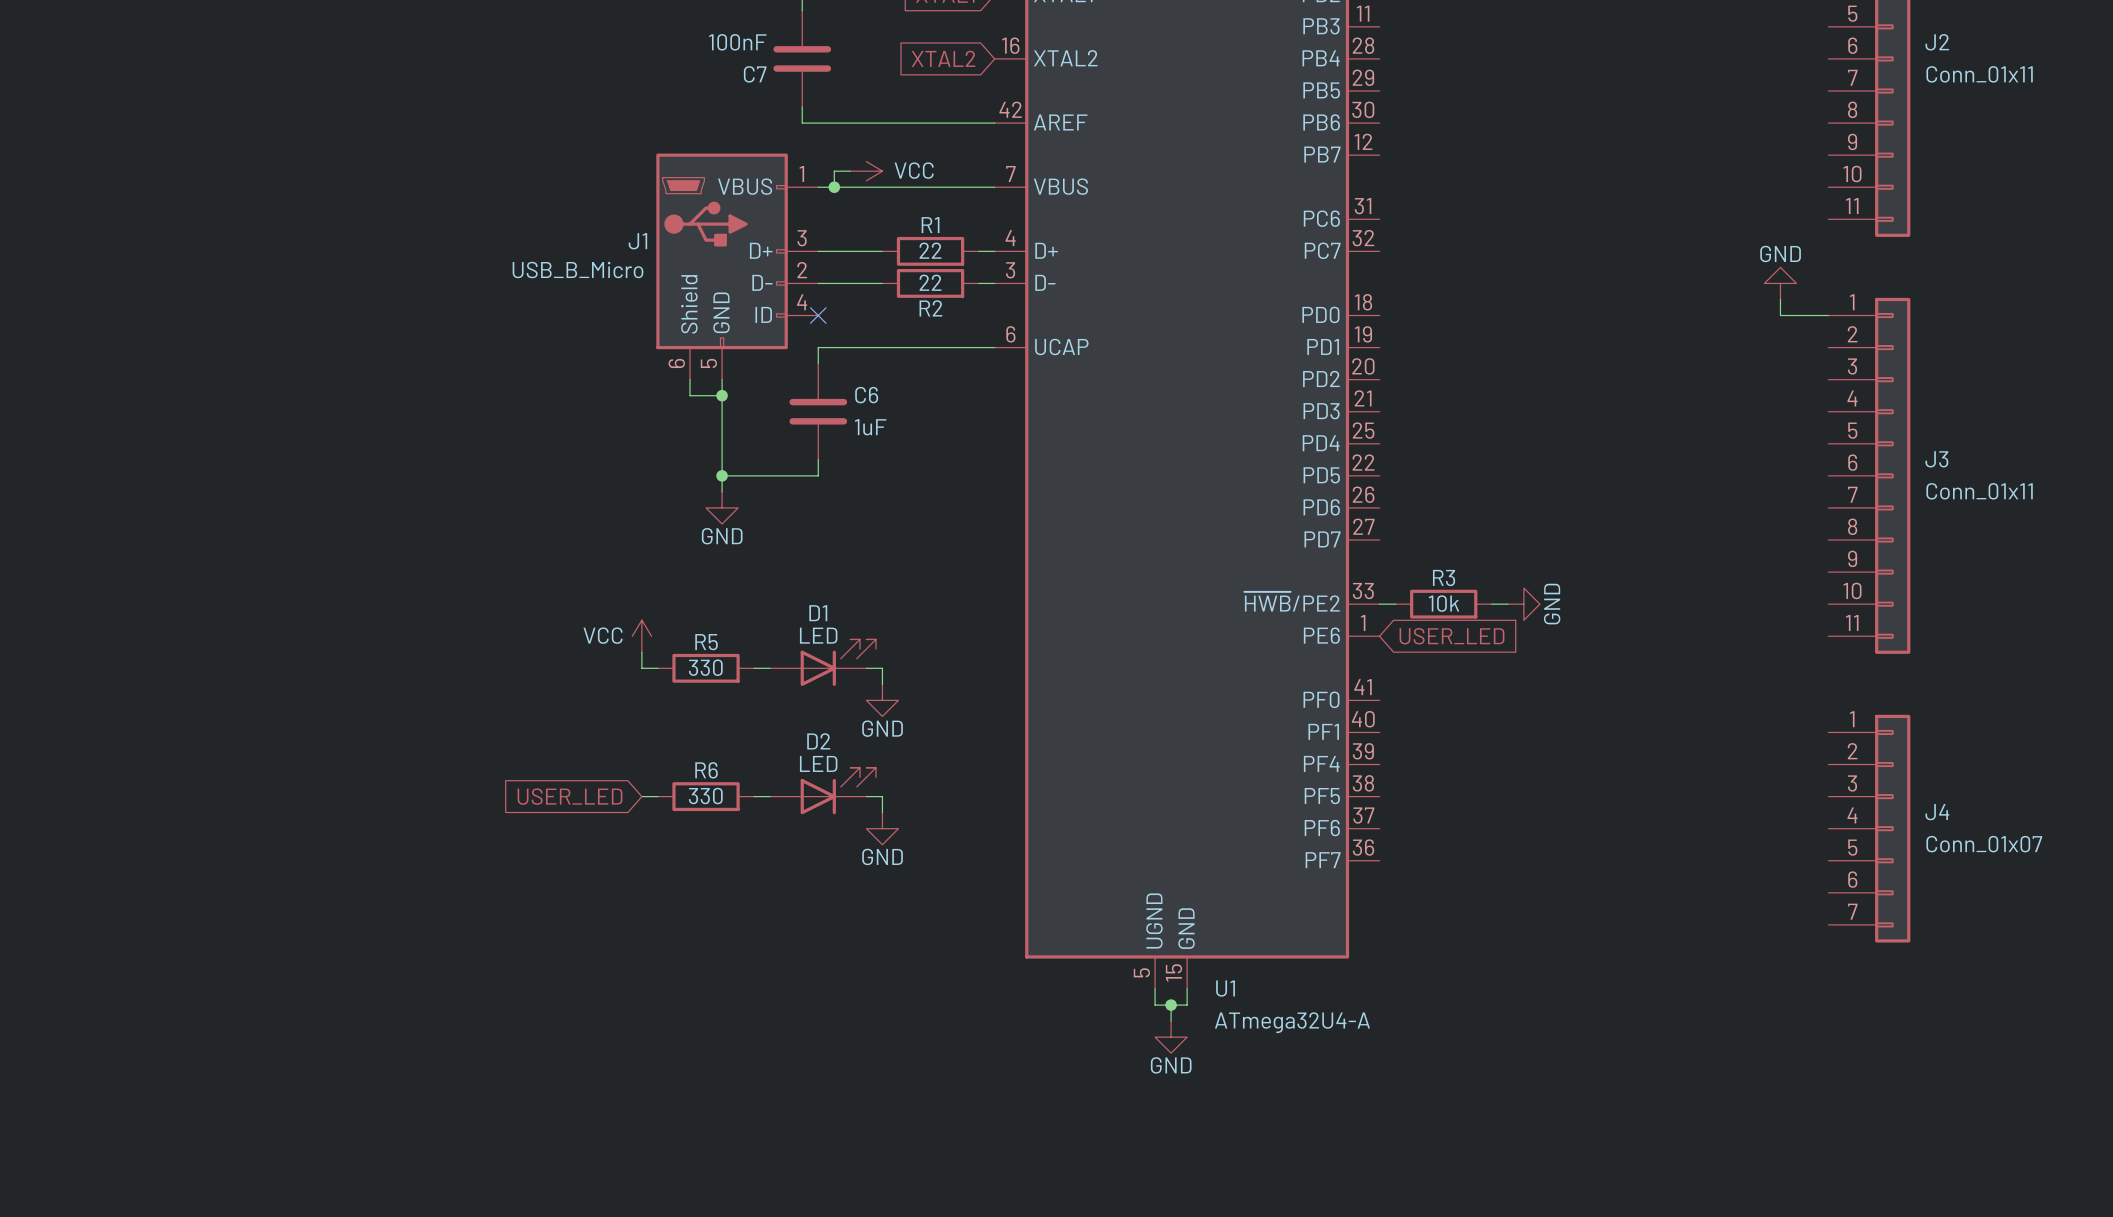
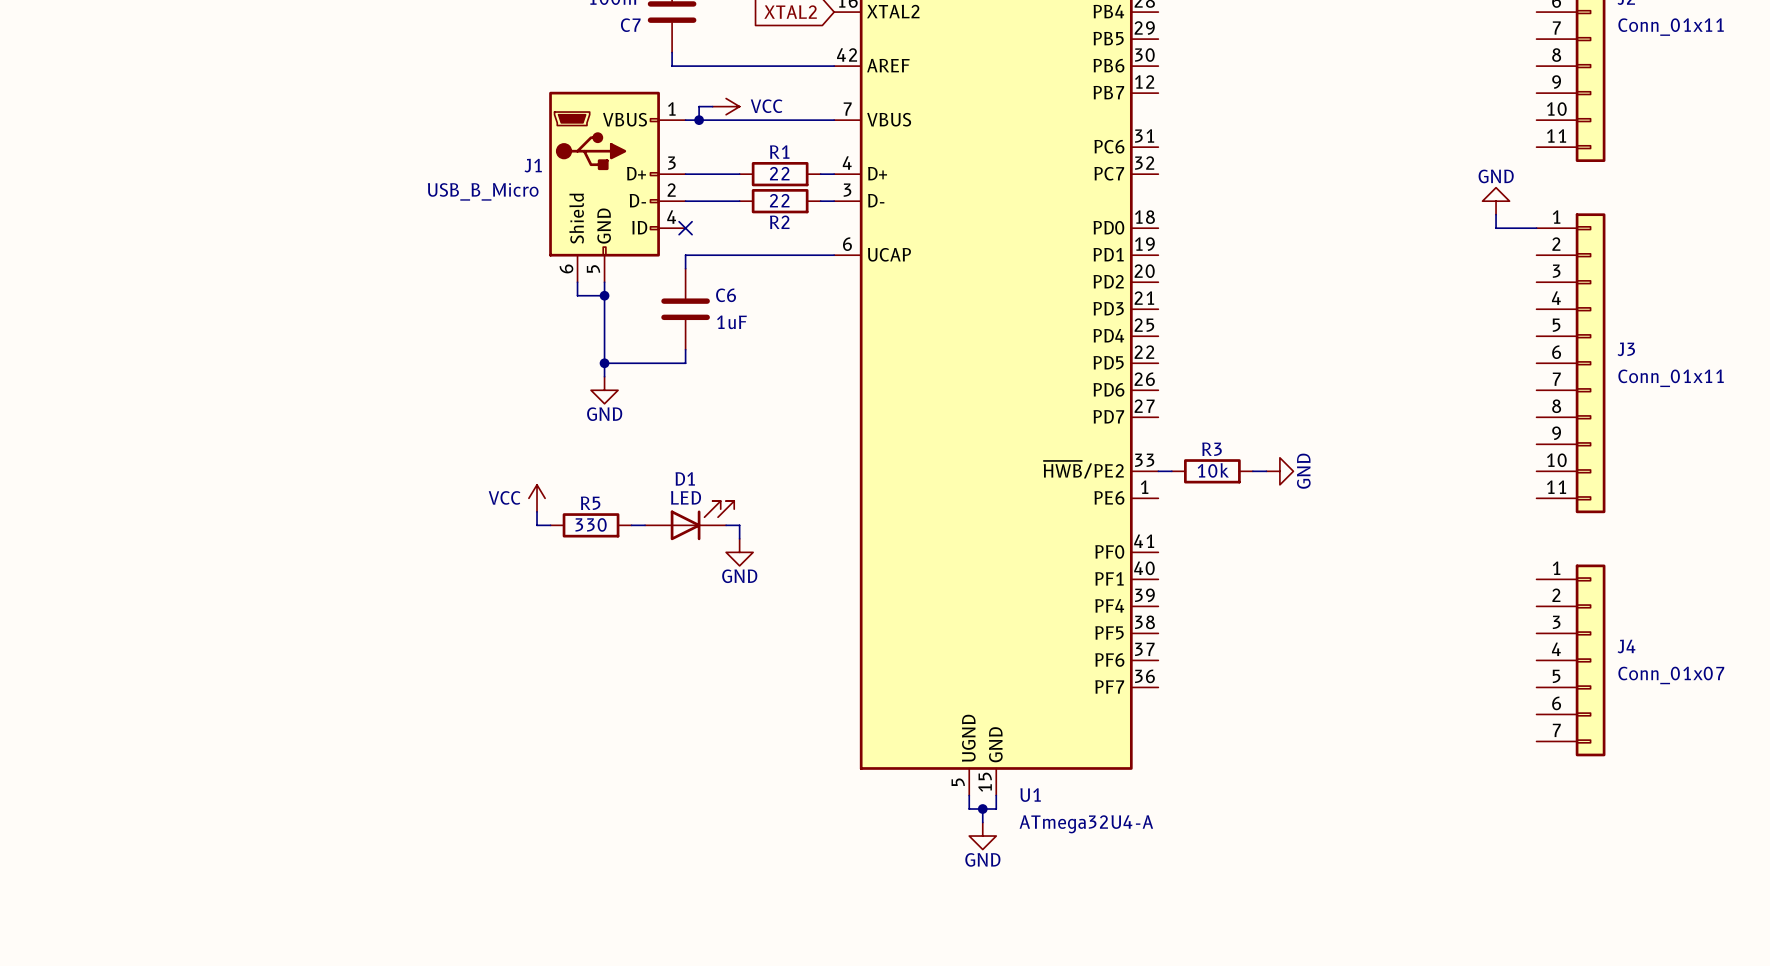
global label: USER_LED (1451, 636) -> none
D2: LED (823, 790) -> none
global label: USER_LED (570, 796) -> none
wire: (641, 796) (657, 796) -> none
R6: 330 (706, 796) -> none
wire: (754, 796) (770, 796) -> none
wire: (866, 796) (882, 796) (882, 812) -> none
power symbol: GND (882, 828) -> none

